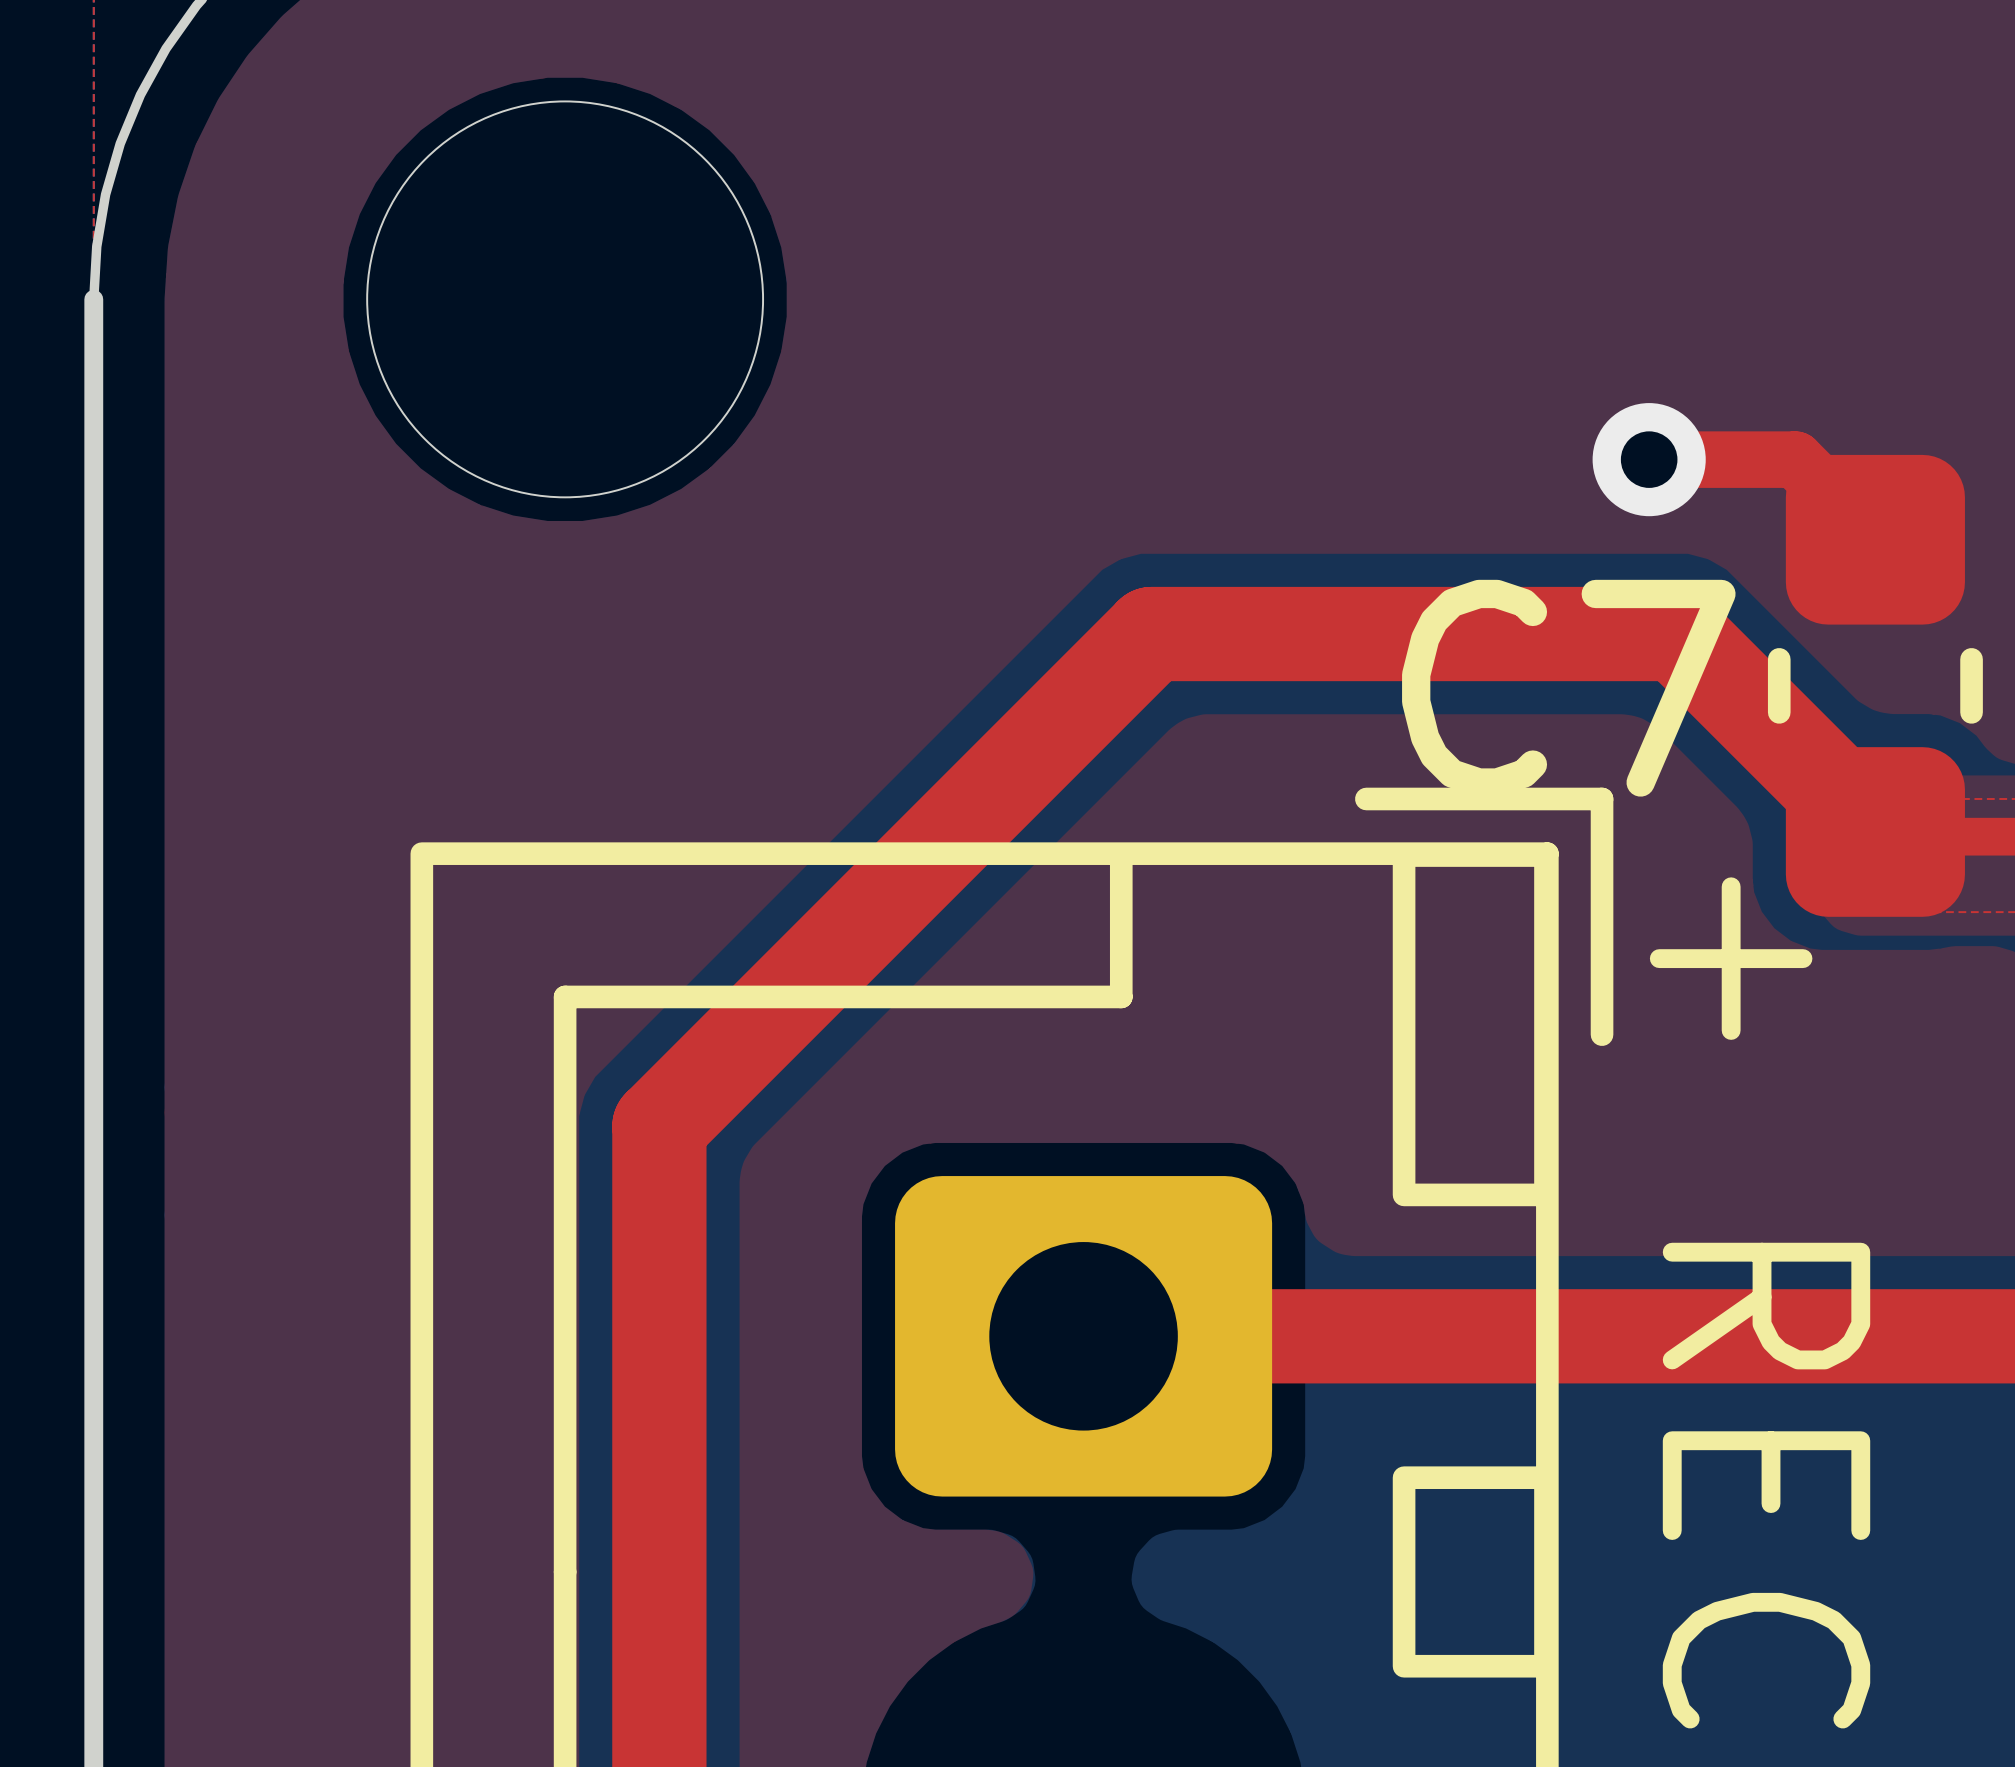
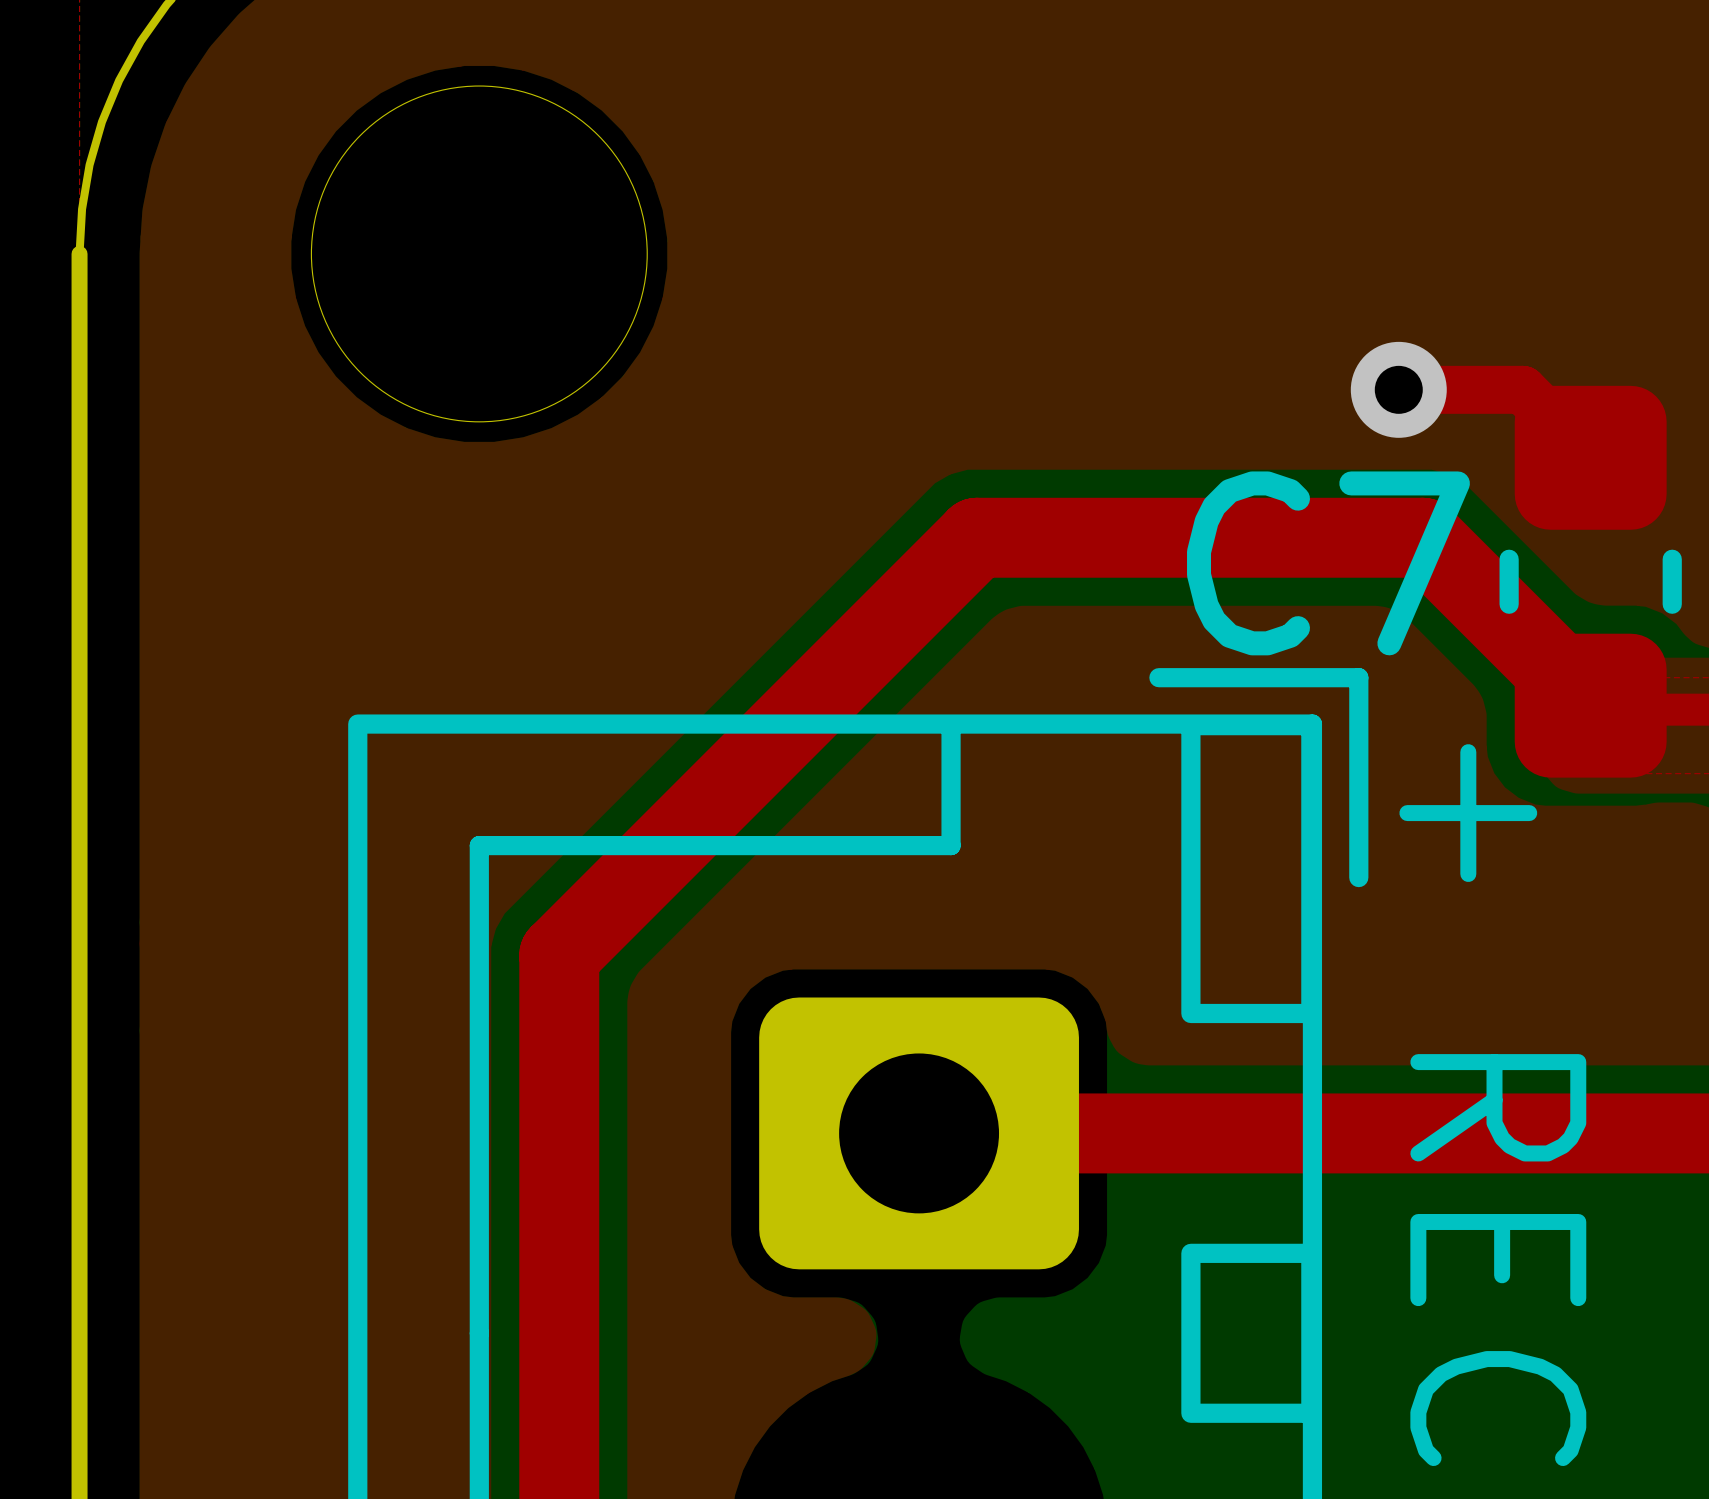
C7 name position: C7 (1568, 688) -> C7 (1328, 563)

